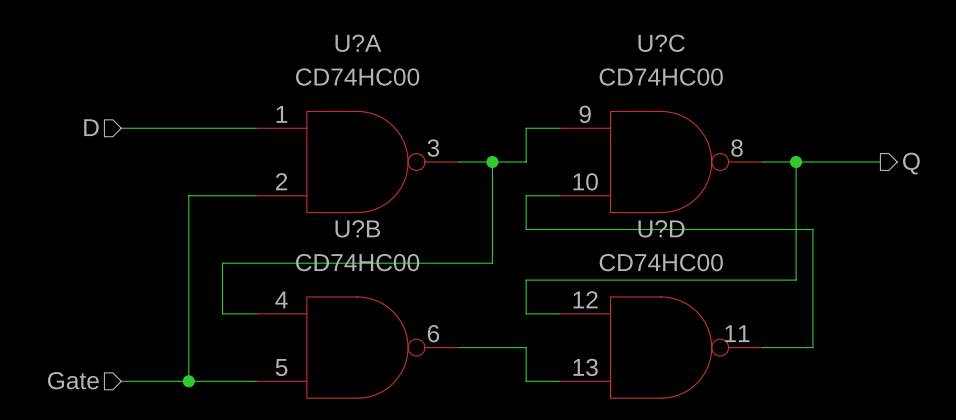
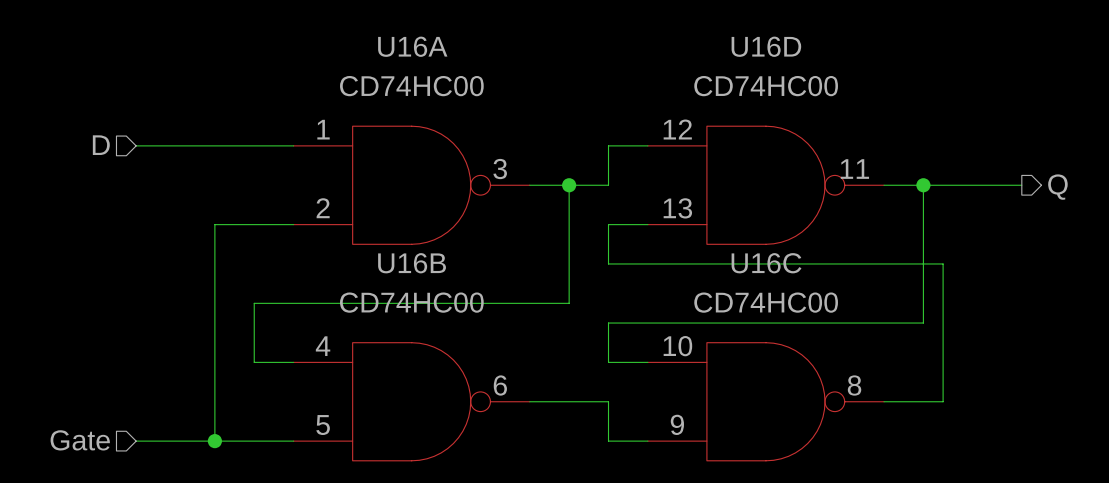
U?A name: U?A (358, 43) -> U16A (412, 46)
U?C name: U?C (661, 43) -> U16D (766, 46)
U?C pin number: 9 (585, 114) -> 12 (677, 129)
U?C pin number: 8 (737, 148) -> 11 (854, 169)
U?C pin number: 10 (585, 181) -> 13 (677, 208)
U?B name: U?B (357, 228) -> U16B (412, 263)
U?D name: U?D (661, 228) -> U16C (766, 263)
U?D pin number: 12 (585, 299) -> 10 (677, 346)
U?D pin number: 11 (737, 333) -> 8 (854, 385)
U?D pin number: 13 (585, 367) -> 9 (677, 424)

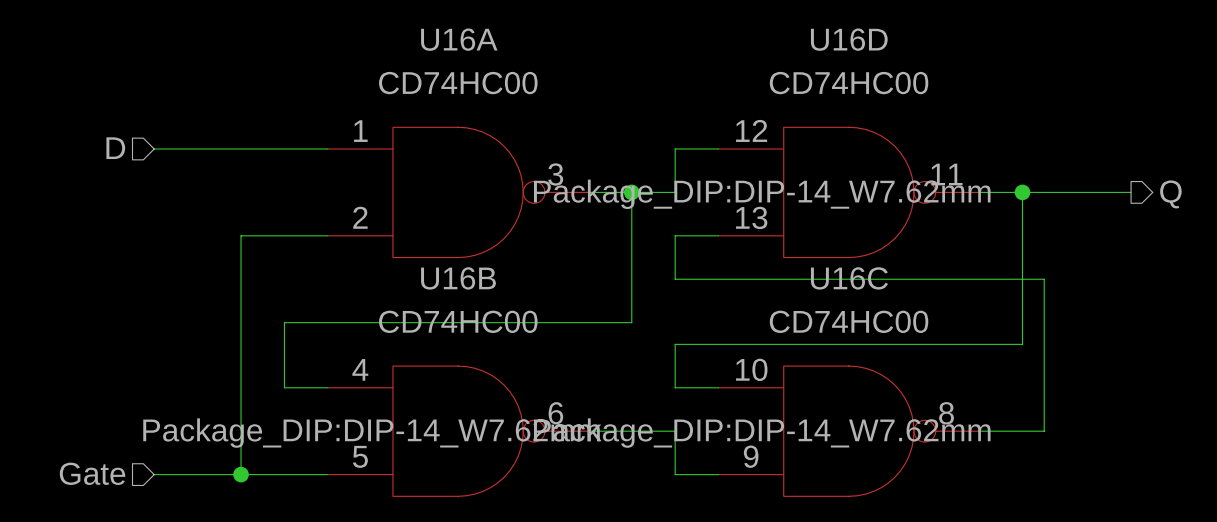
U16D text: none -> Package_DIP:DIP-14_W7.62mm (762, 194)
U16B text: none -> Package_DIP:DIP-14_W7.62mm (371, 433)
U16C text: none -> Package_DIP:DIP-14_W7.62mm (762, 433)

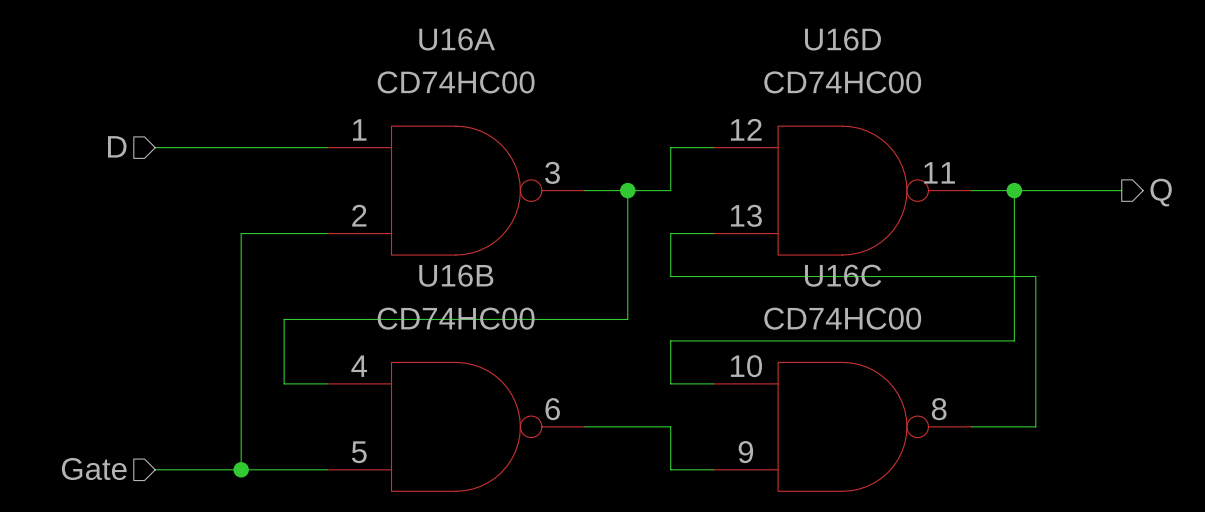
U16D text: Package_DIP:DIP-14_W7.62mm (762, 194) -> none
U16B text: Package_DIP:DIP-14_W7.62mm (371, 433) -> none
U16C text: Package_DIP:DIP-14_W7.62mm (762, 433) -> none

